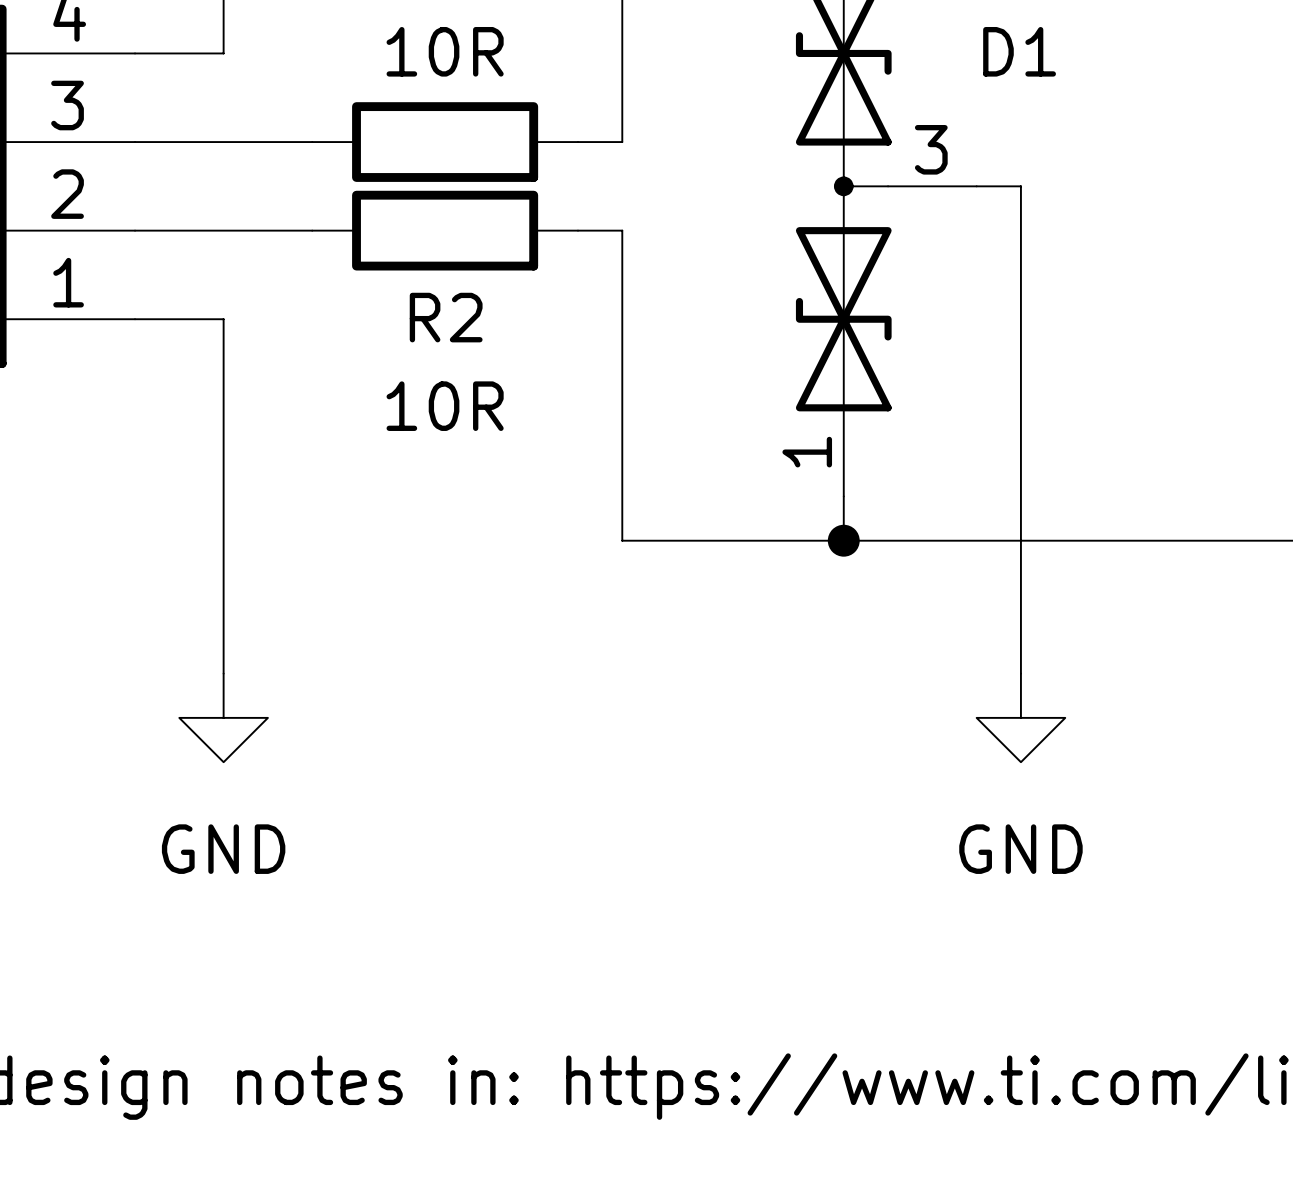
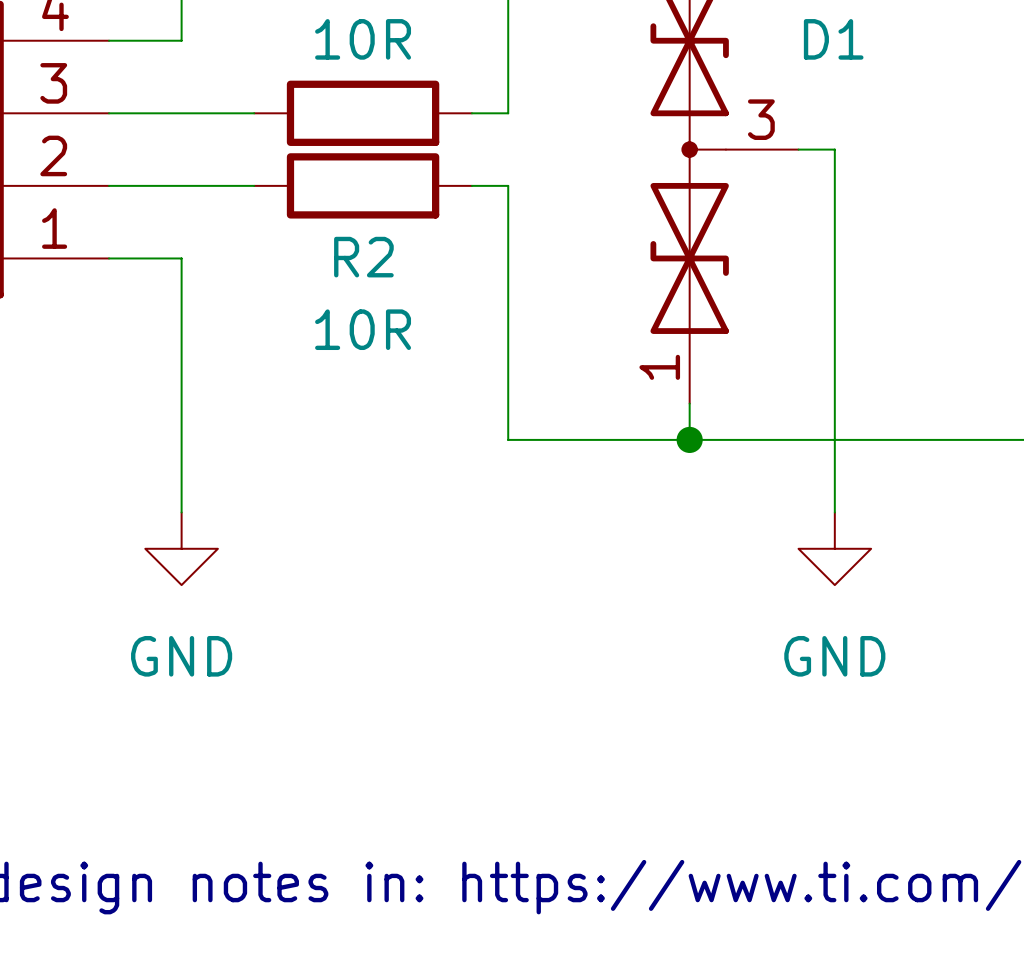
power symbol position: GND (223, 717) -> GND (181, 548)
power symbol position: GND (1020, 717) -> GND (834, 548)

